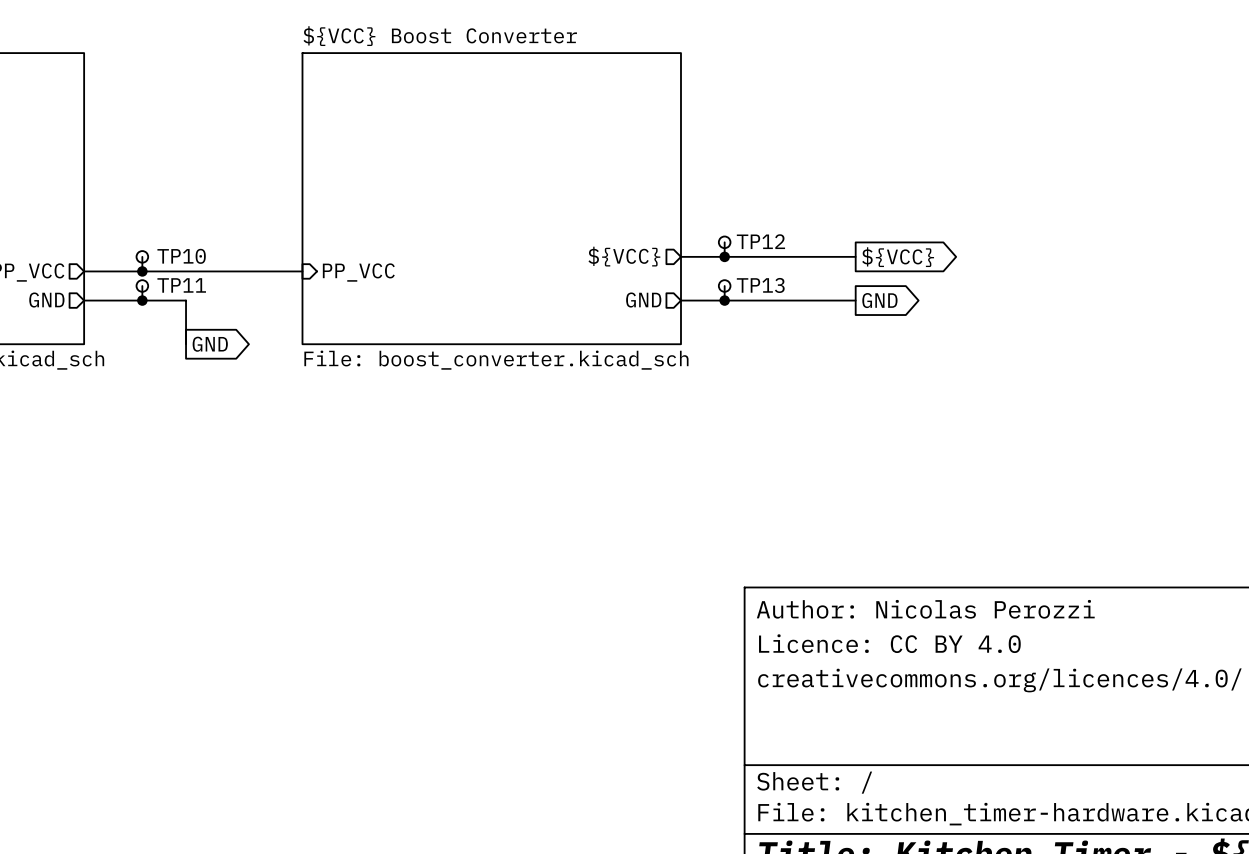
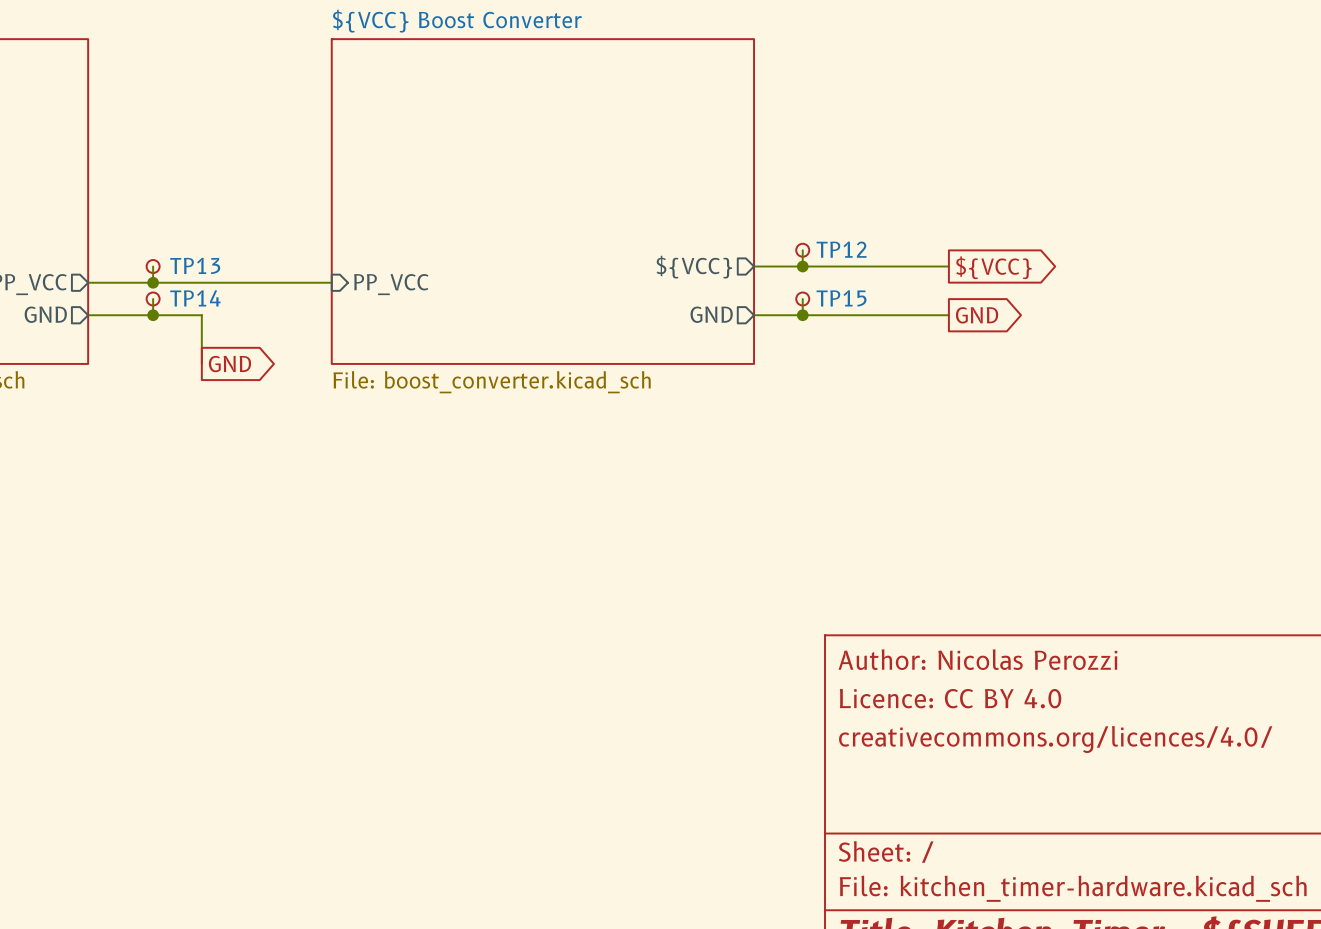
TP10 name: TP10 (181, 256) -> TP13 (195, 265)
TP11 name: TP11 (181, 285) -> TP14 (195, 298)
TP13 name: TP13 (760, 285) -> TP15 (841, 298)

